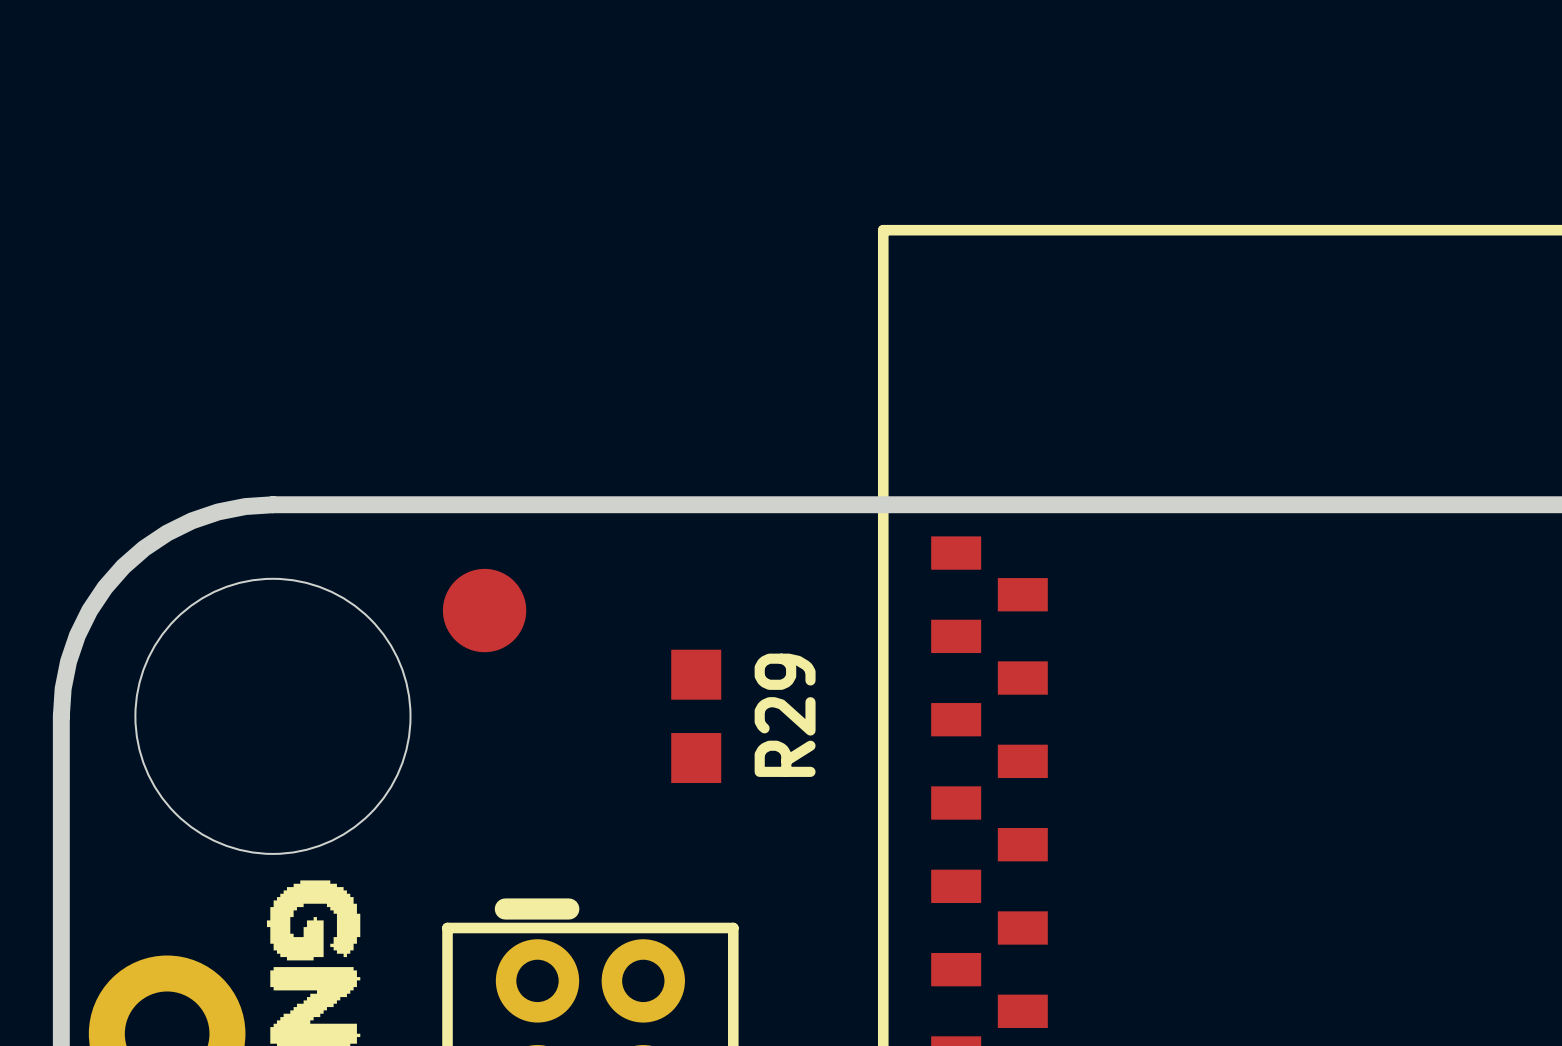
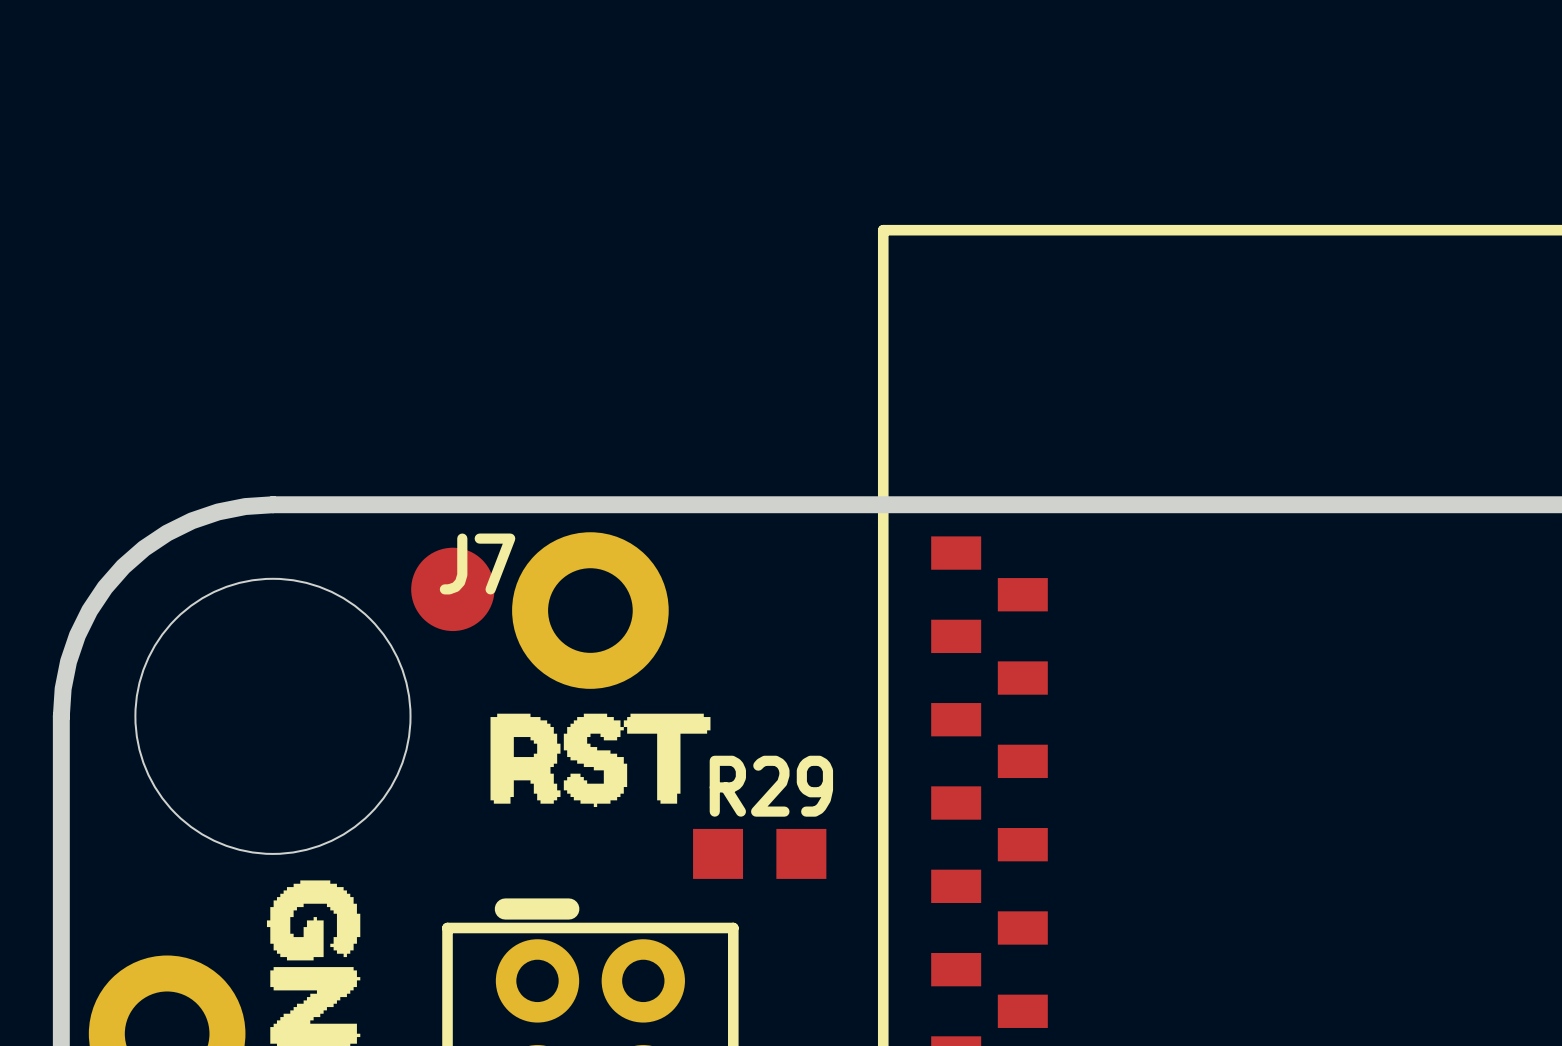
part position: (484, 610) -> (452, 589)
J7: none -> (590, 610)
drawing: none -> [490, 713, 711, 808]
R29 rotation: 0° (696, 716) -> 90° clockwise (759, 853)
R29 position: (696, 716) -> (759, 853)

